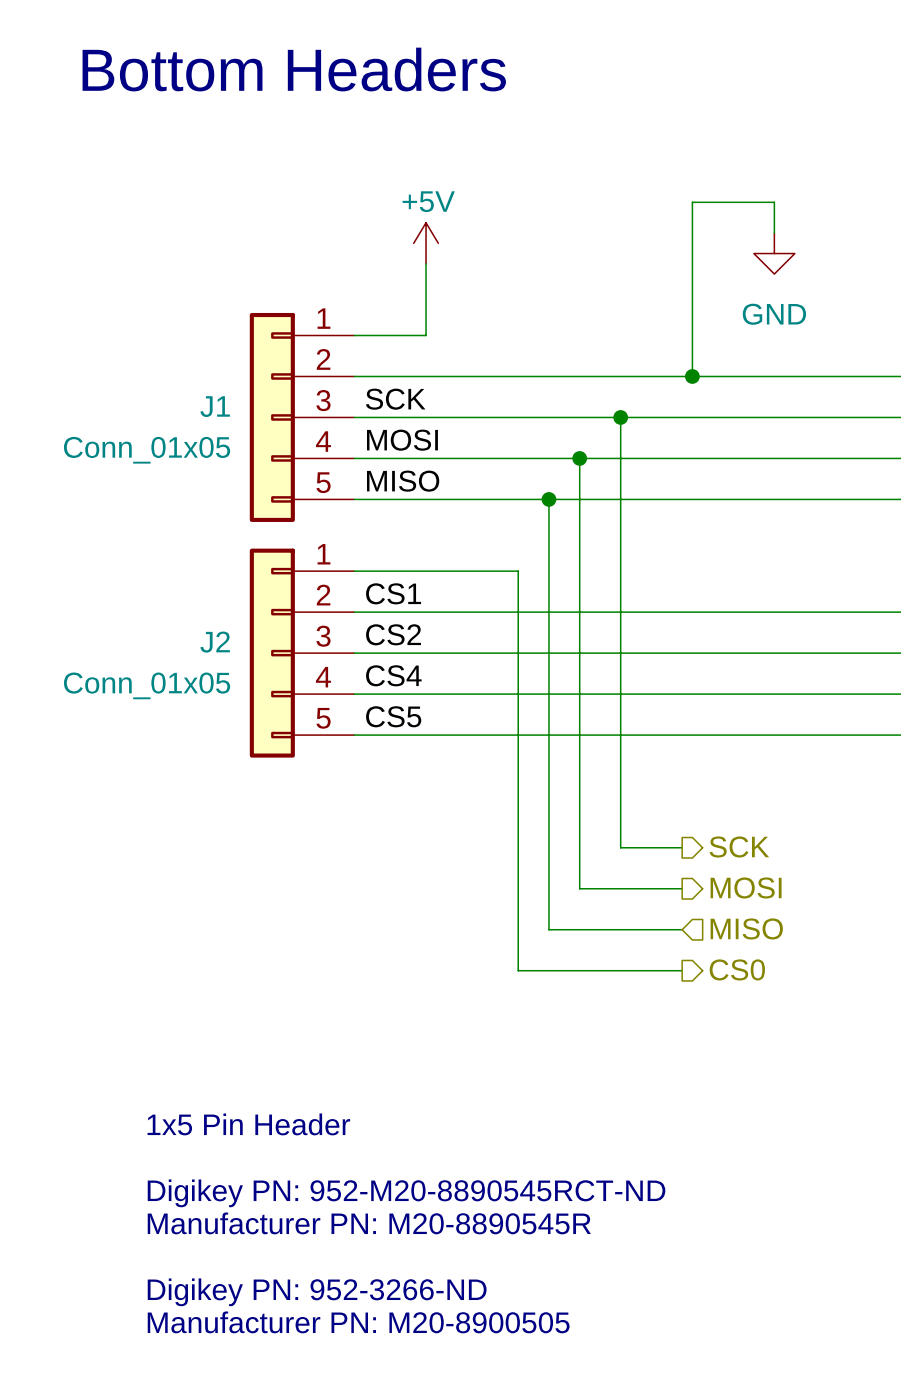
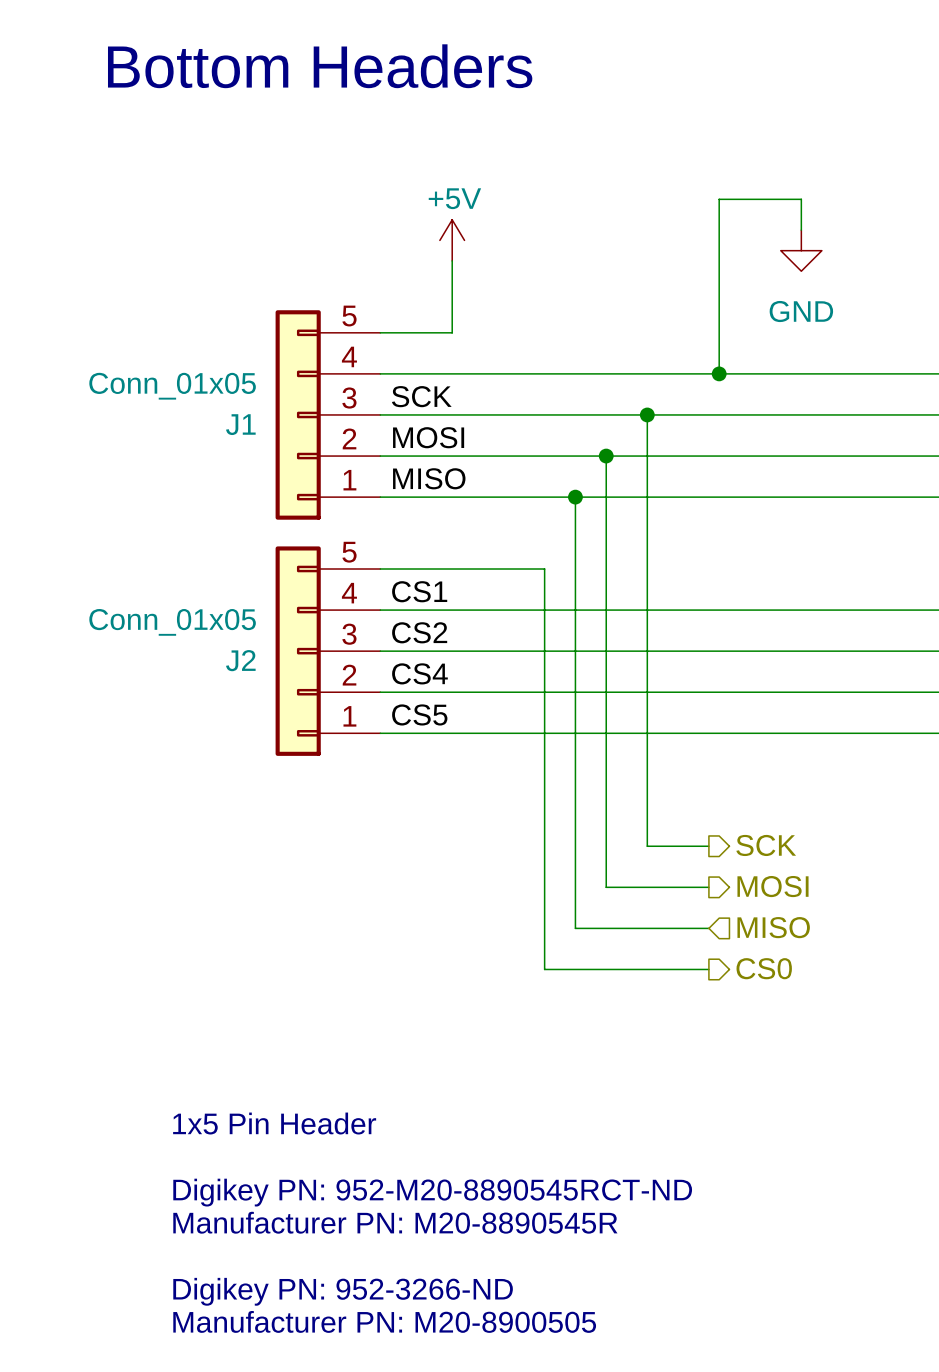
J1 flip: as is (272, 417) -> up-down (298, 414)
J2 flip: as is (272, 653) -> up-down (298, 651)

